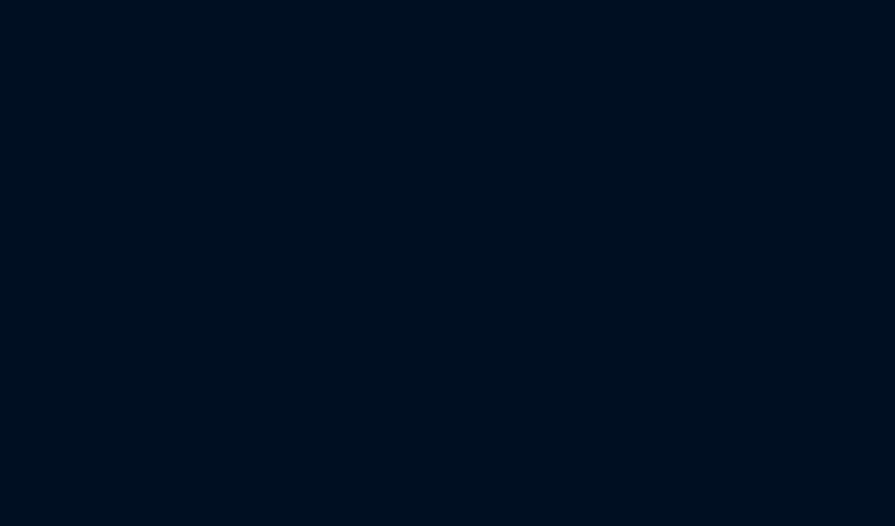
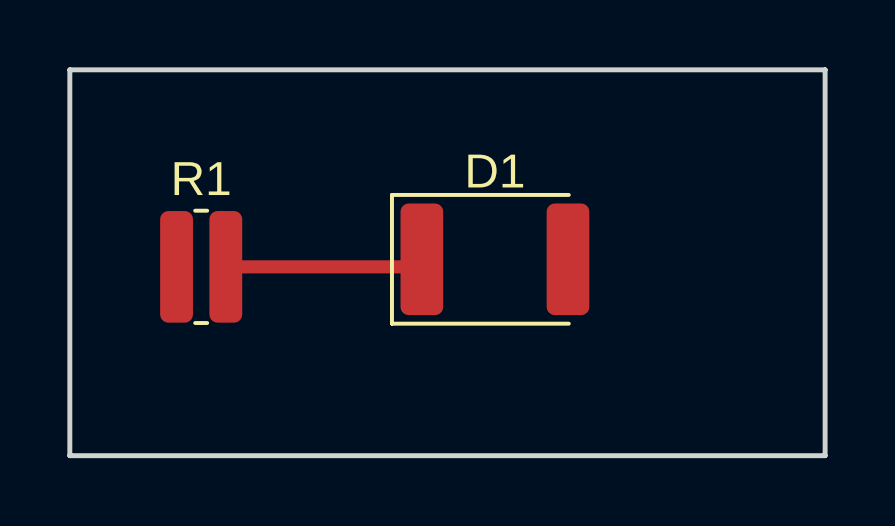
board edge: none -> (69, 69) (825, 69) (825, 455) (69, 455) (69, 69)
top track: none -> (421, 259) (414, 266) (225, 266)
D1: none -> (489, 259)
R1: none -> (201, 266)

